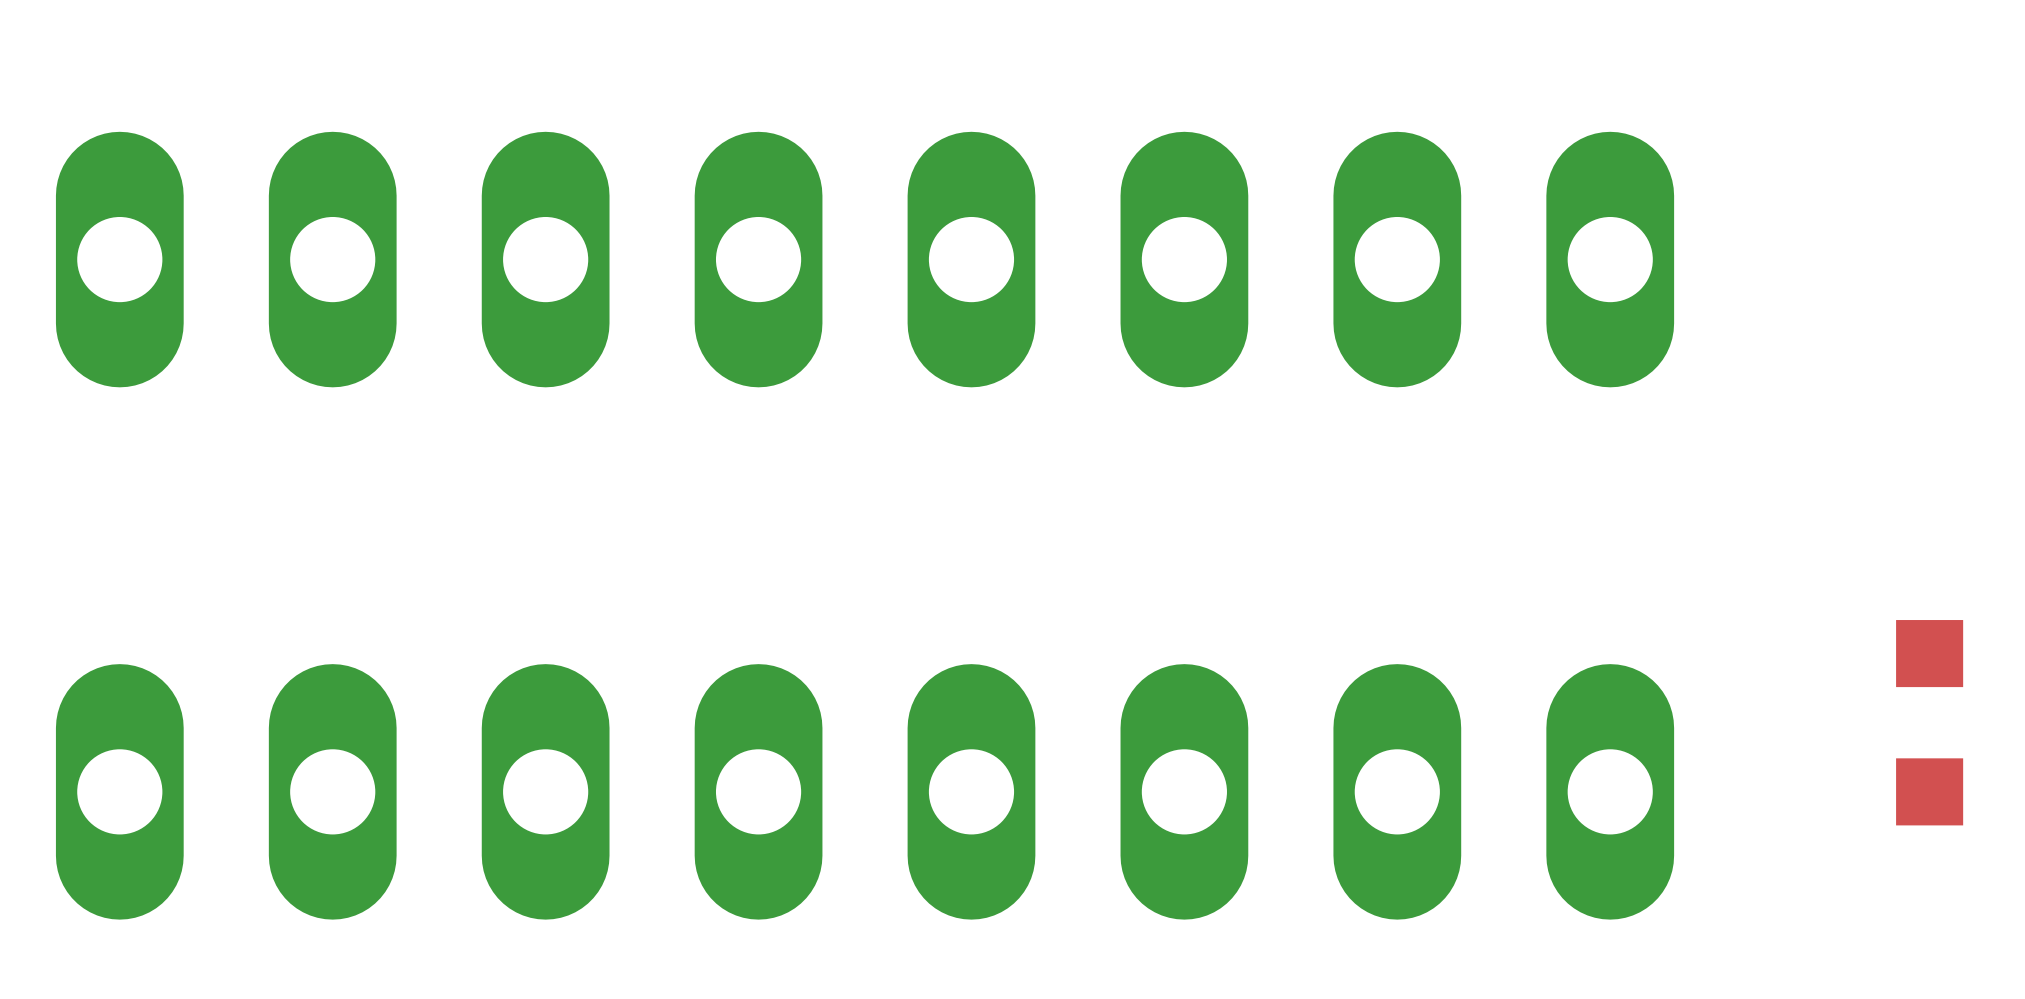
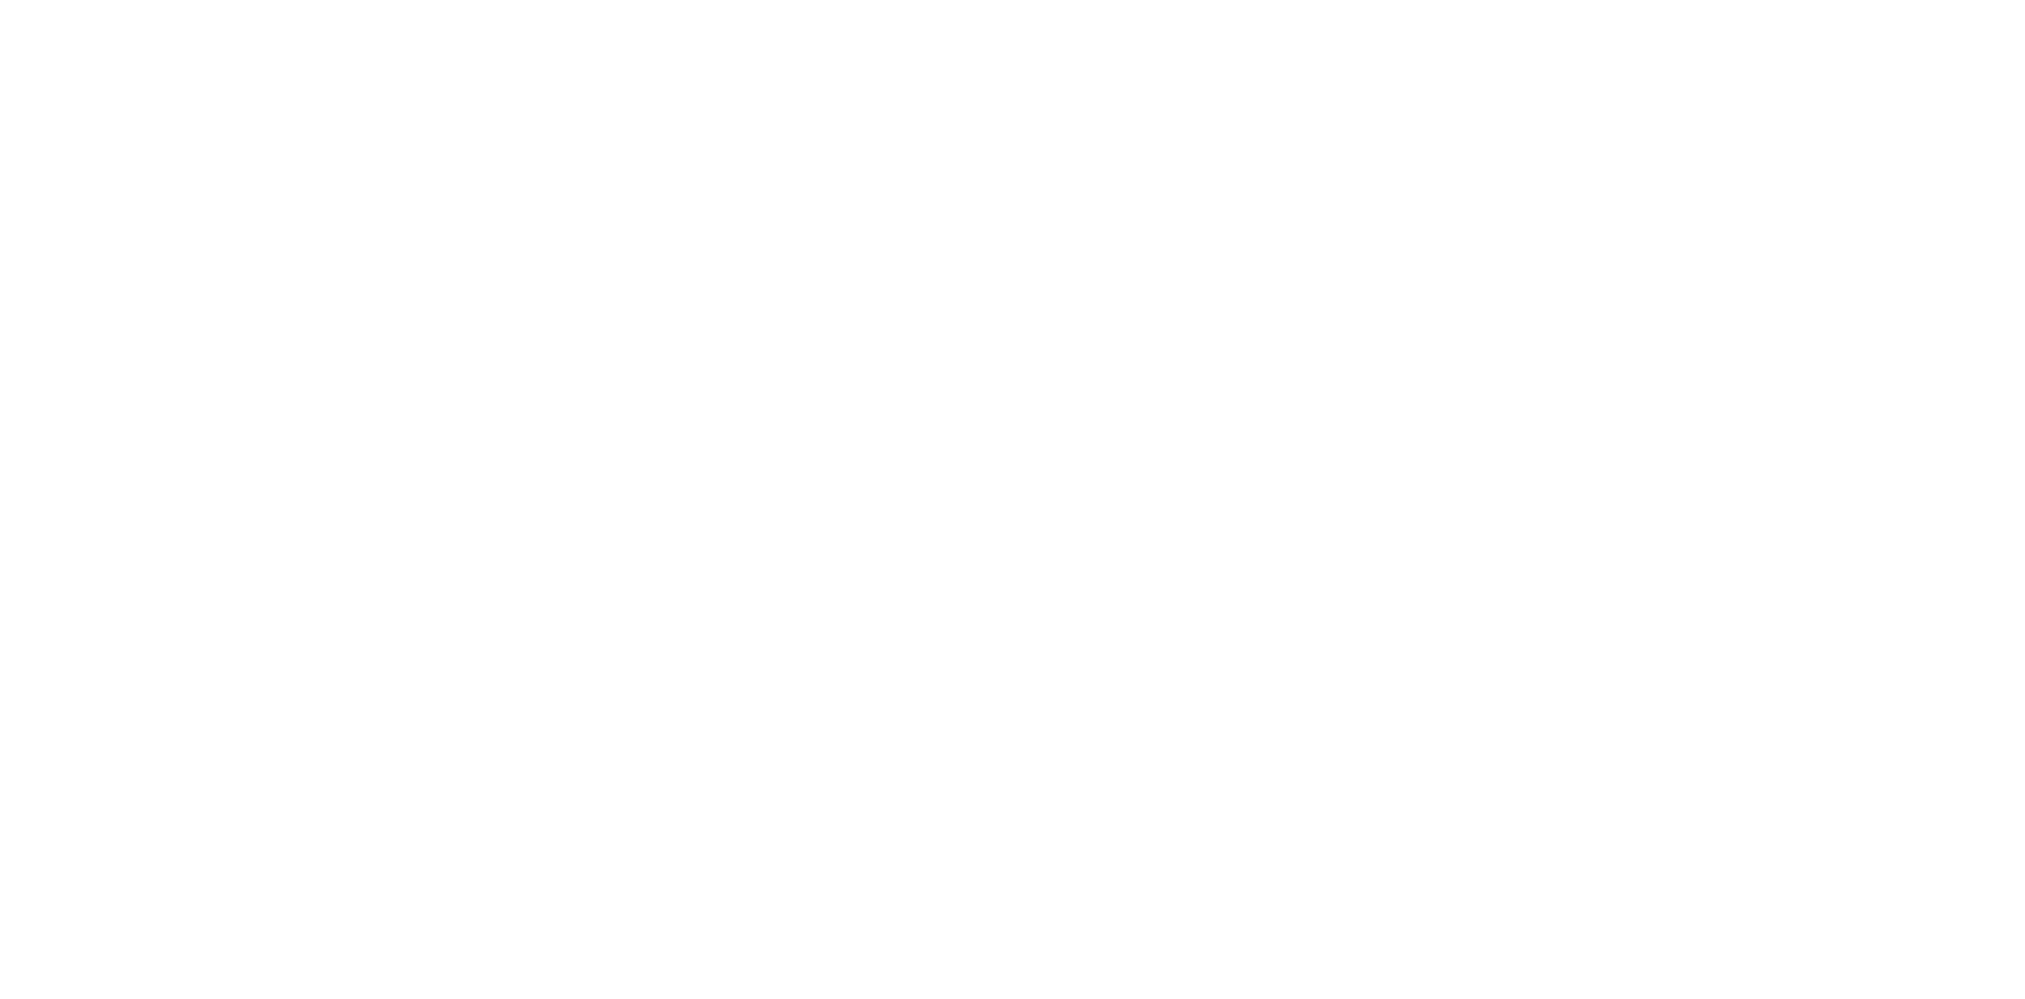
part: (865, 259) -> none
part: (1929, 722) -> none
part: (865, 791) -> none

